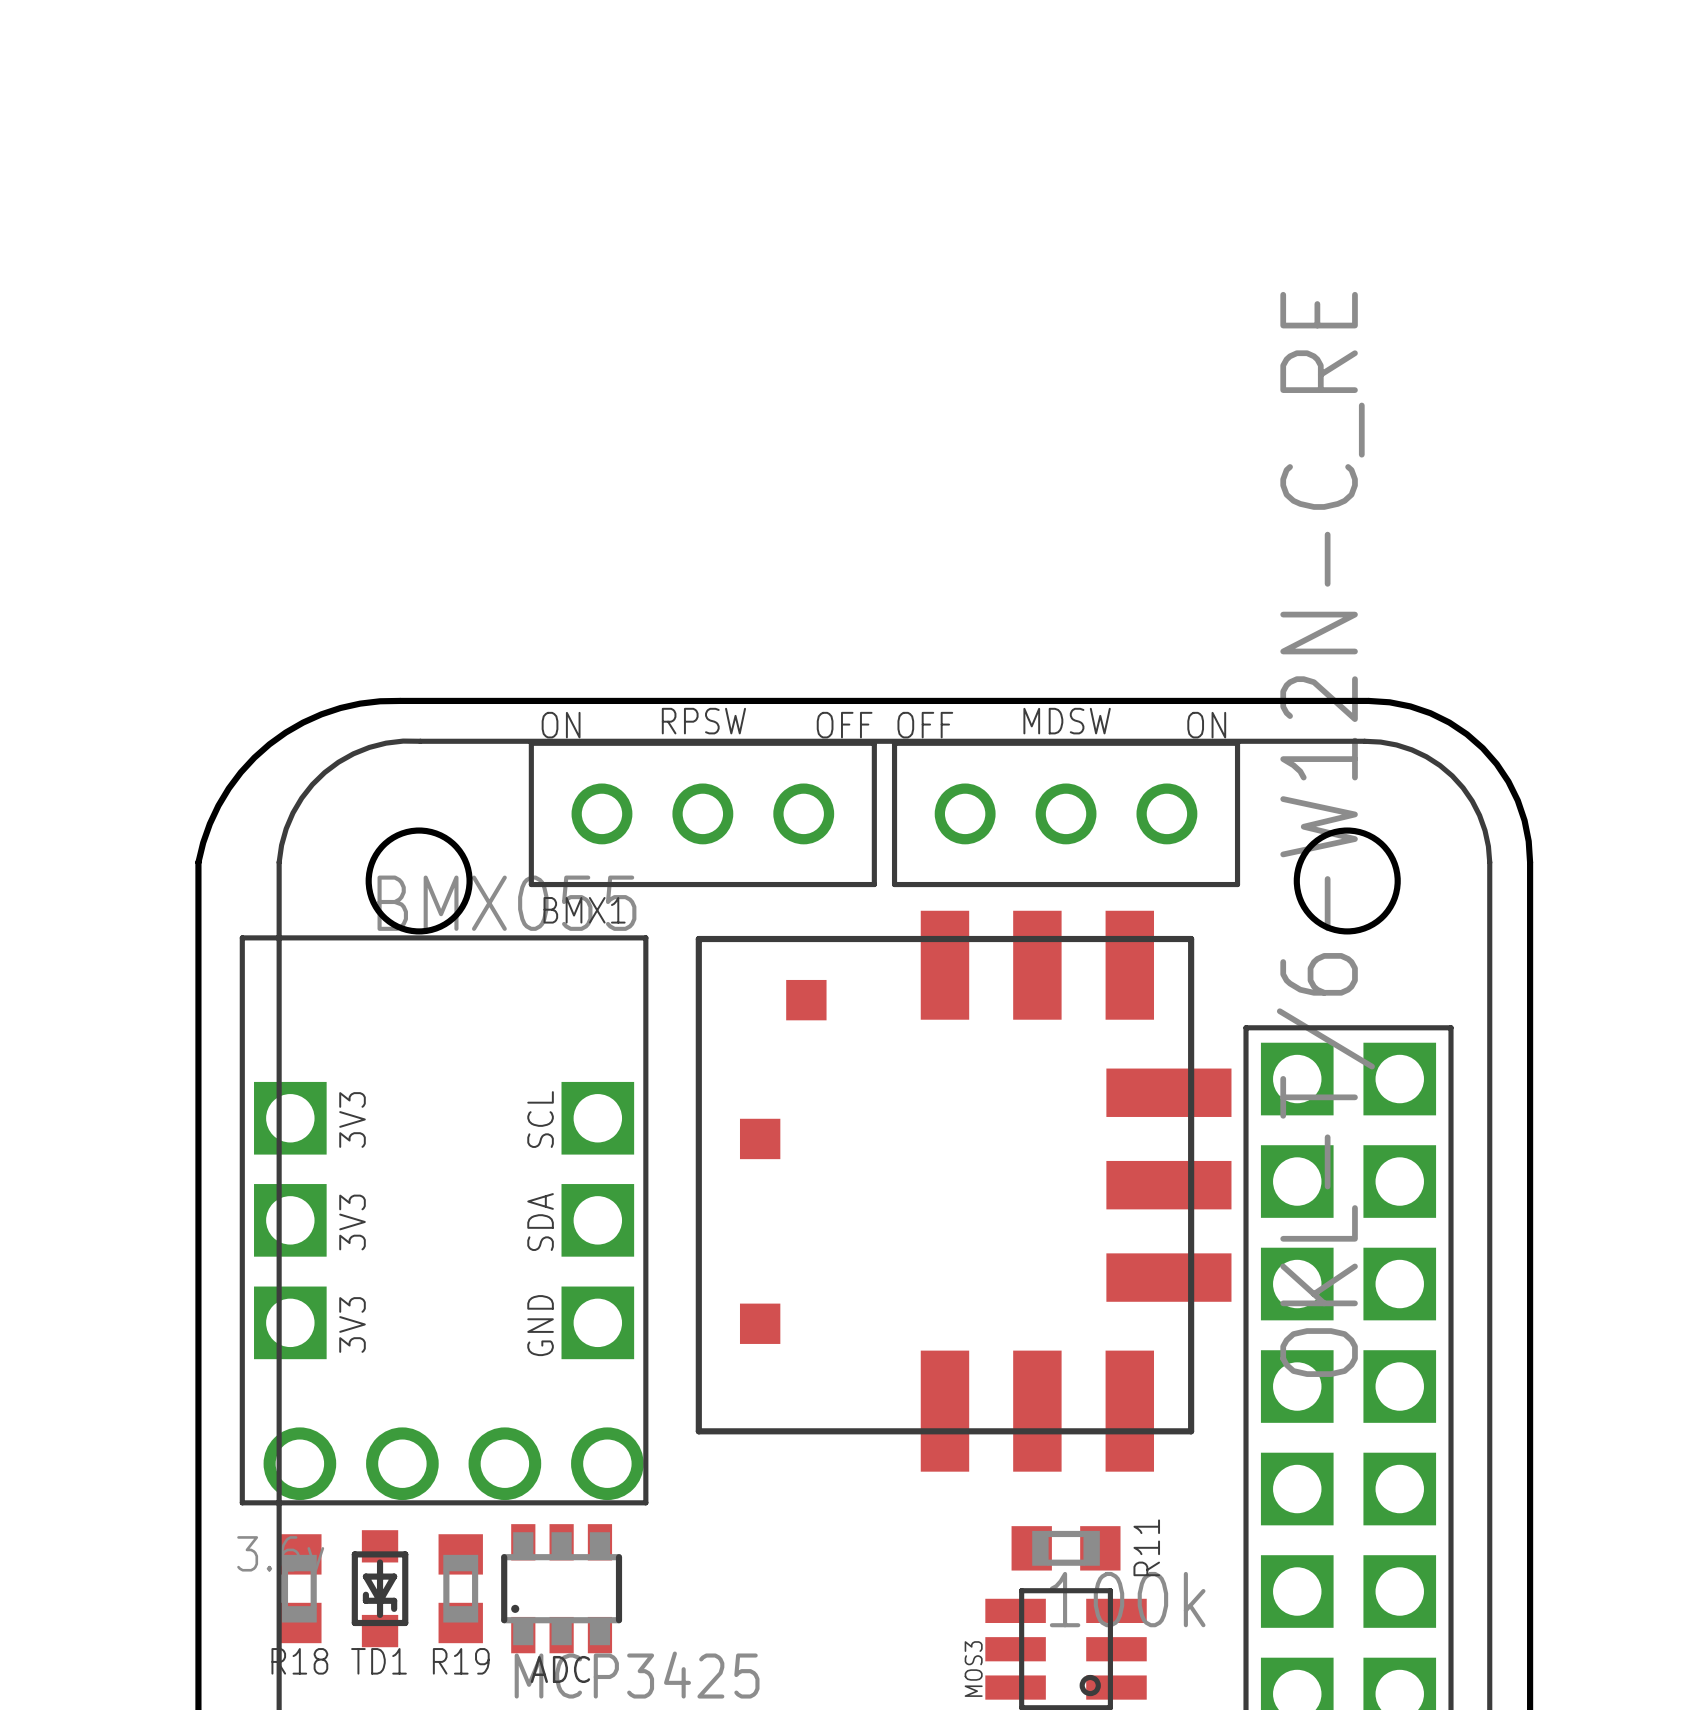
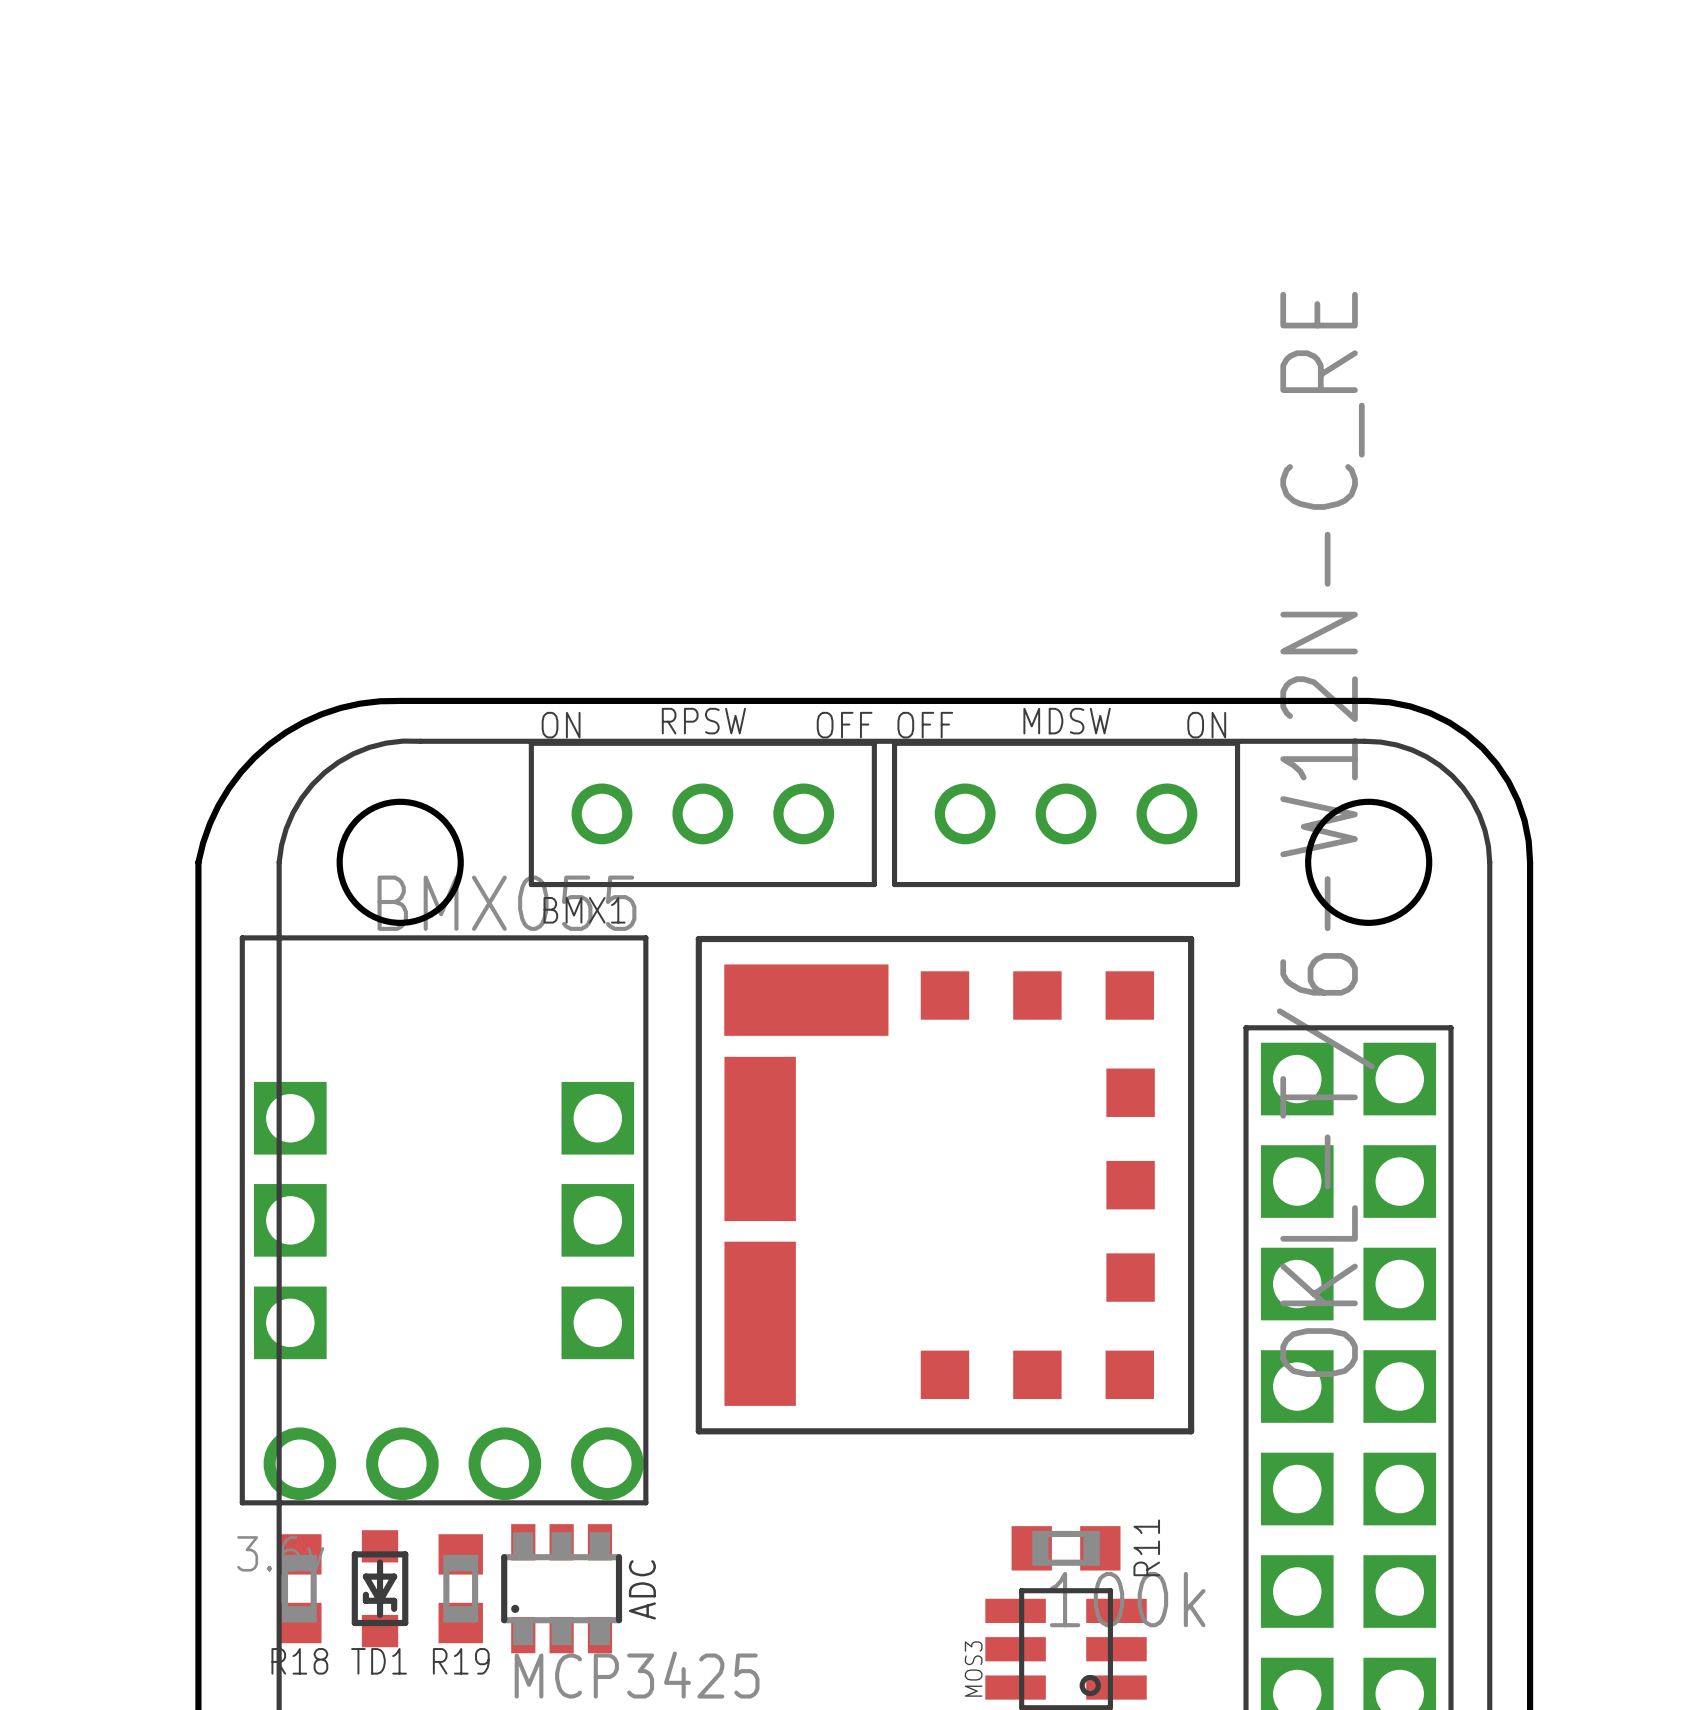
round board edge size: [365, 827, 473, 935] -> [336, 798, 464, 926]
round board edge size: [1293, 827, 1401, 935] -> [1305, 798, 1433, 926]
part footprint: [695, 910, 1232, 1472] -> [695, 935, 1195, 1435]
text: SCL (540, 1119) -> none
text: 3V3 (352, 1120) -> none
text: 3V3 (352, 1222) -> none
text: SDA (540, 1222) -> none
text: 3V3 (352, 1324) -> none
text: GND (540, 1325) -> none
ADC name rotation: 0° (560, 1669) -> 90° counterclockwise (642, 1589)
ADC name position: ADC (560, 1669) -> ADC (642, 1589)

